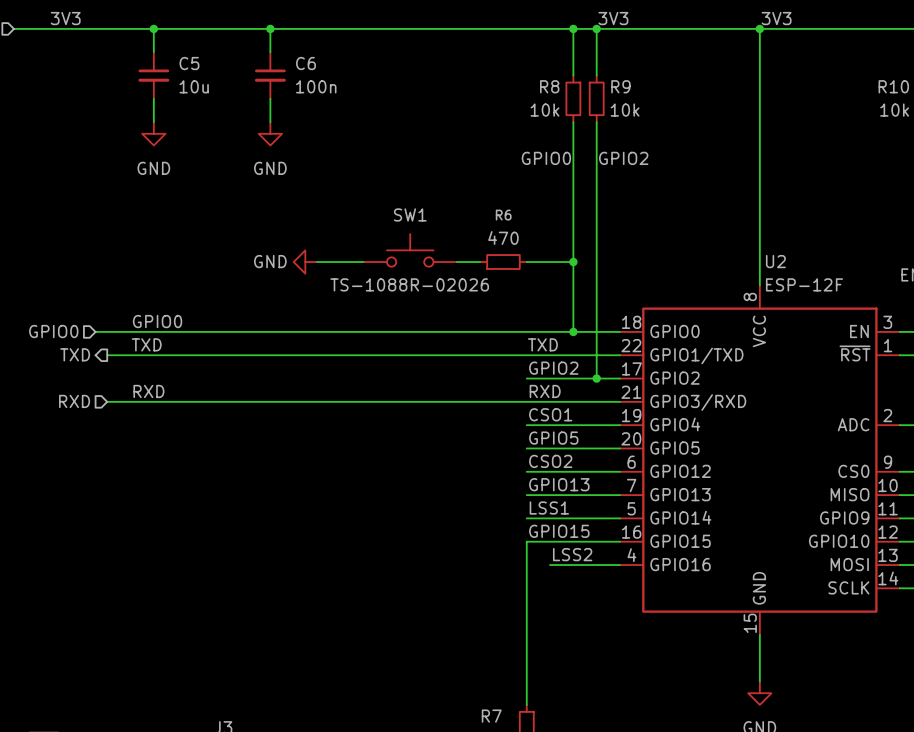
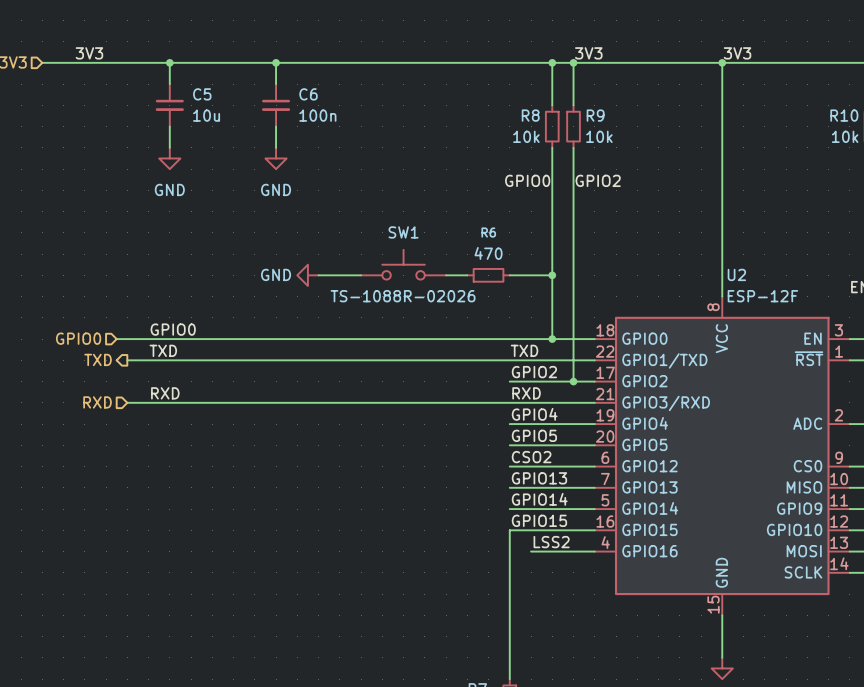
label: CSO1 (550, 414) -> GPIO4 (534, 414)
label: LSS1 (549, 508) -> GPIO14 (539, 499)

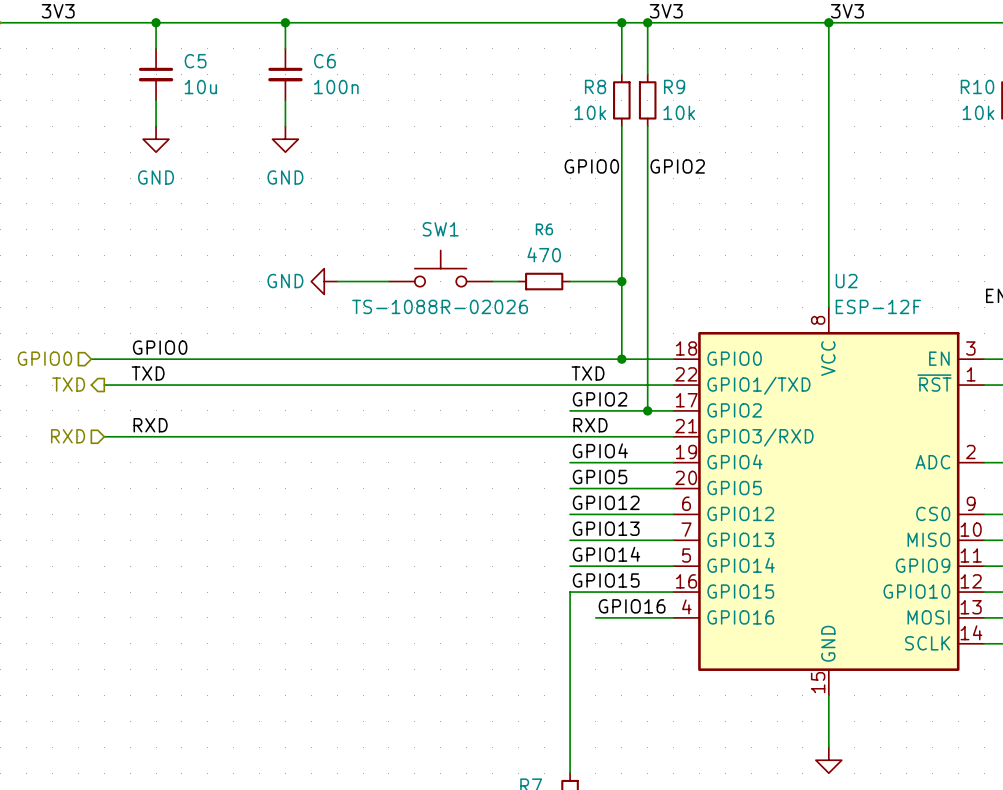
label: CSO2 (531, 457) -> GPIO12 (606, 502)
label: LSS2 (551, 542) -> GPIO16 (632, 606)

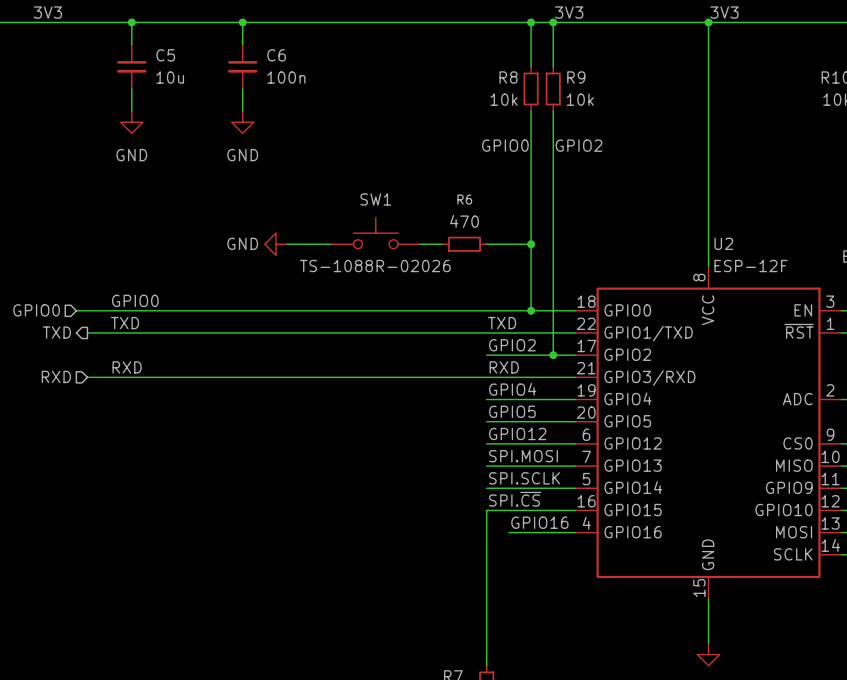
label: GPIO13 (606, 528) -> SPI.MOSI (523, 456)
label: GPIO14 (606, 554) -> SPI.SCLK (524, 478)
label: GPIO15 (606, 580) -> SPI.~{CS} (515, 499)

